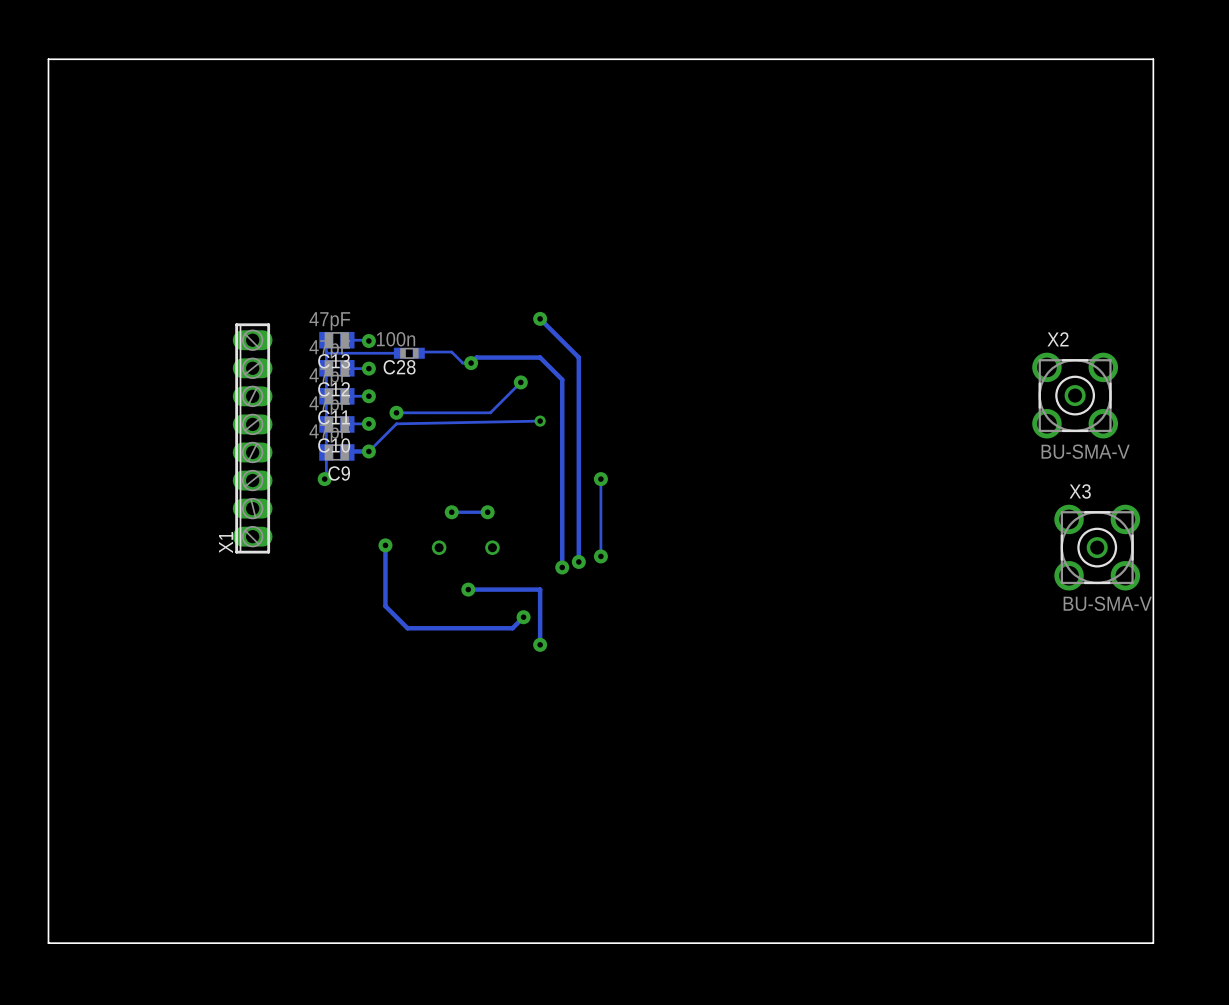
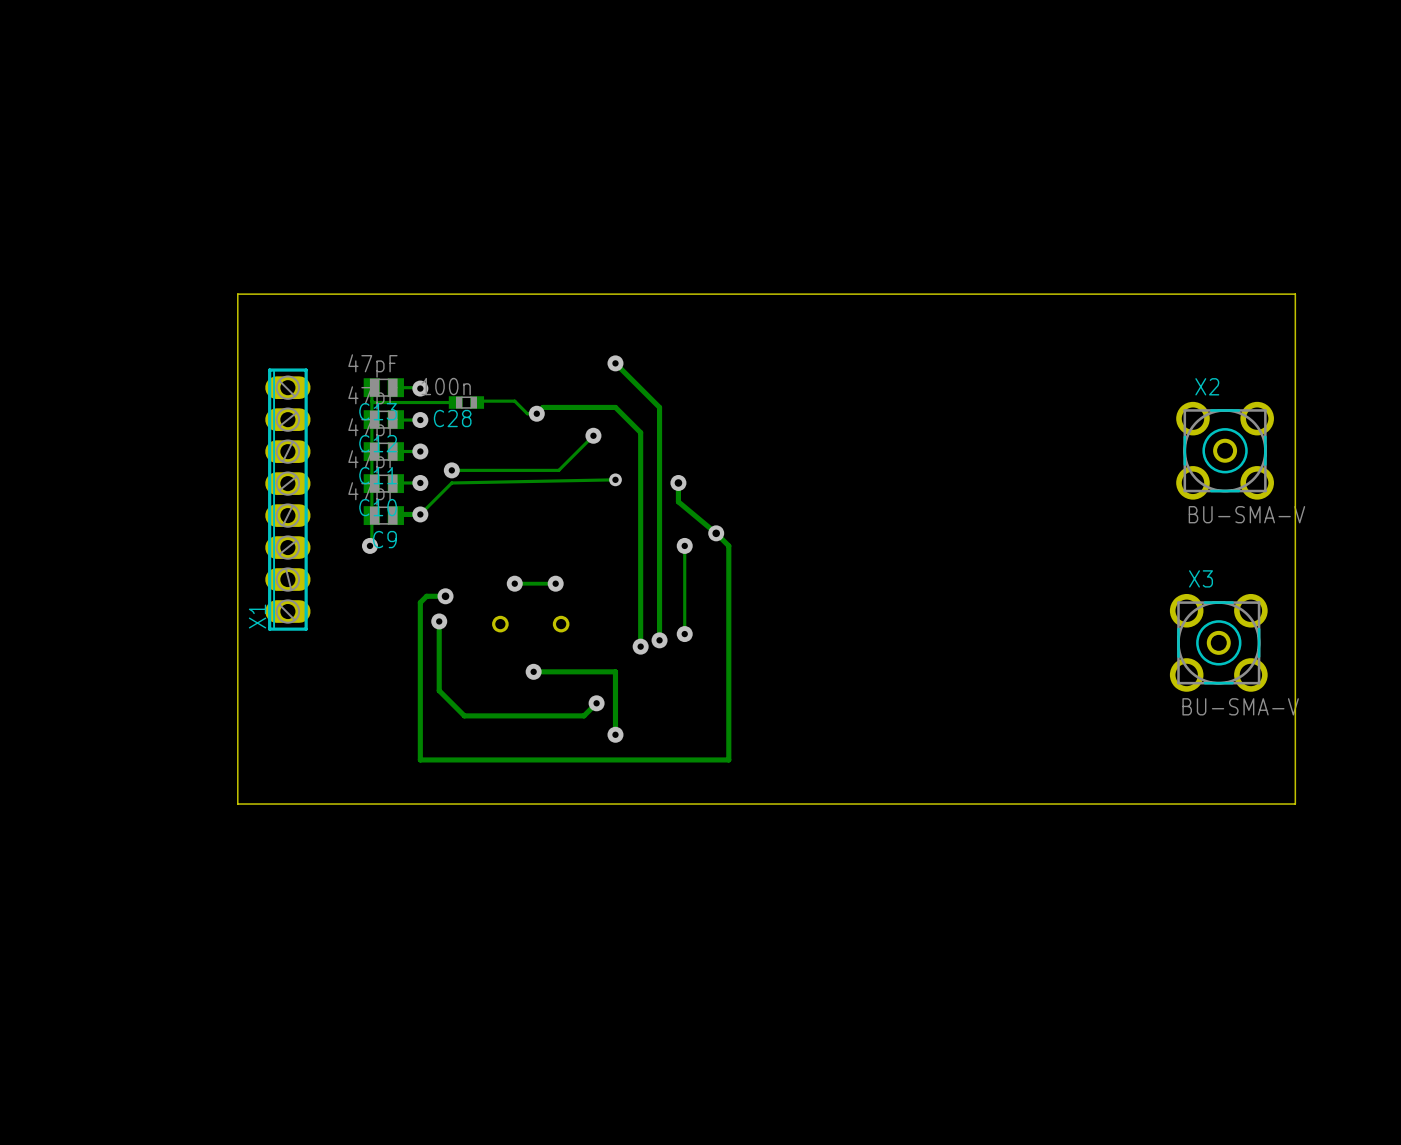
board edge: (1153, 59) (48, 59) (48, 943) (1153, 943) (1153, 59) -> none
board edge: none -> (1295, 294) (237, 294) (237, 804) (1295, 804) (1295, 294)
track: none -> (678, 482) (678, 501) (728, 545) (728, 759) (420, 759) (420, 602) (426, 596) (445, 596)
via: none -> (678, 482)
via: none -> (716, 533)
via: none -> (445, 596)
X3 position: (1097, 547) -> (1218, 642)

